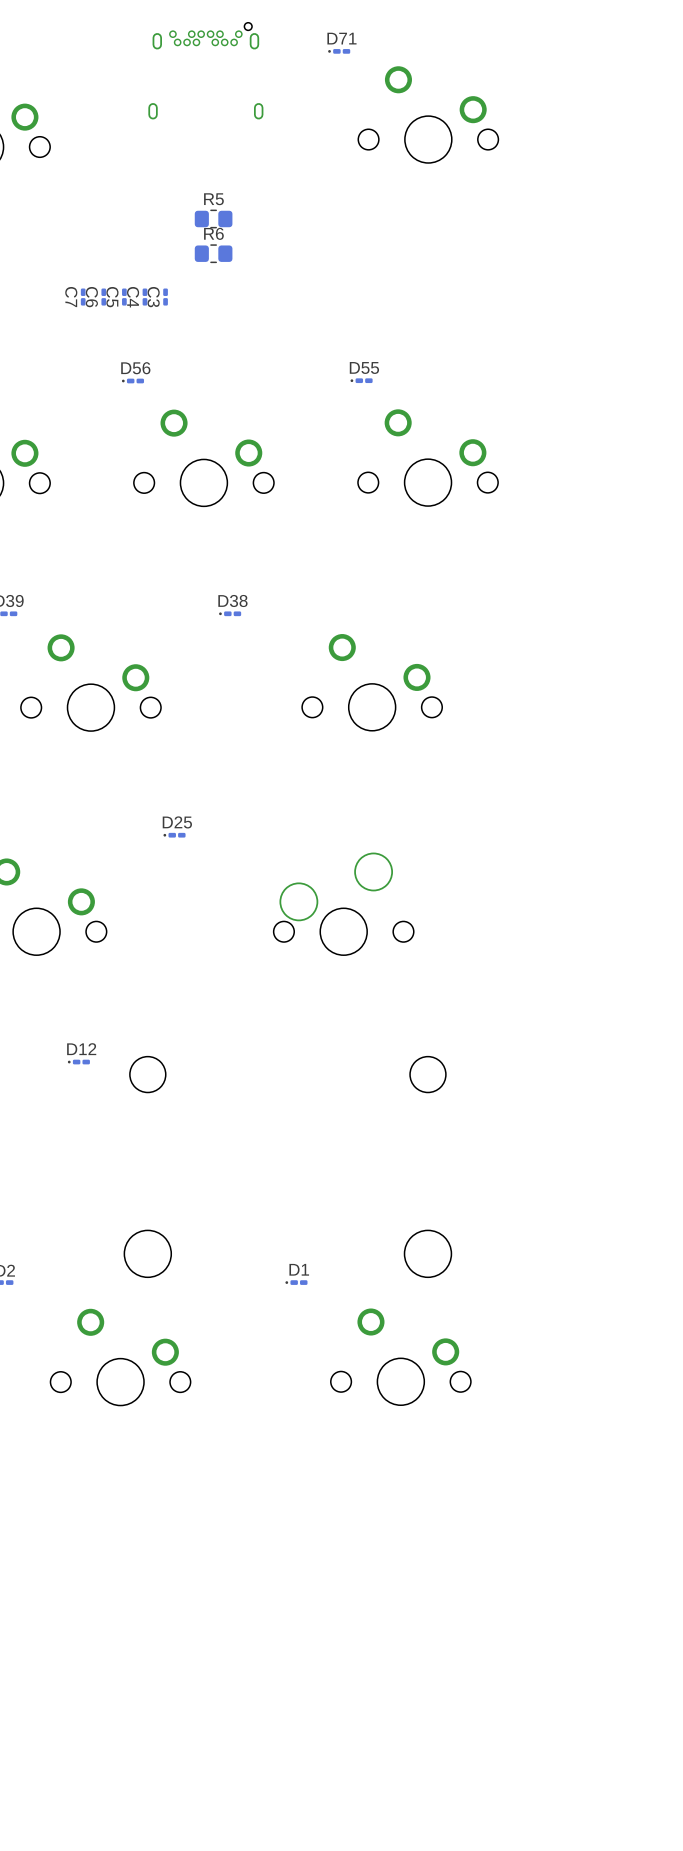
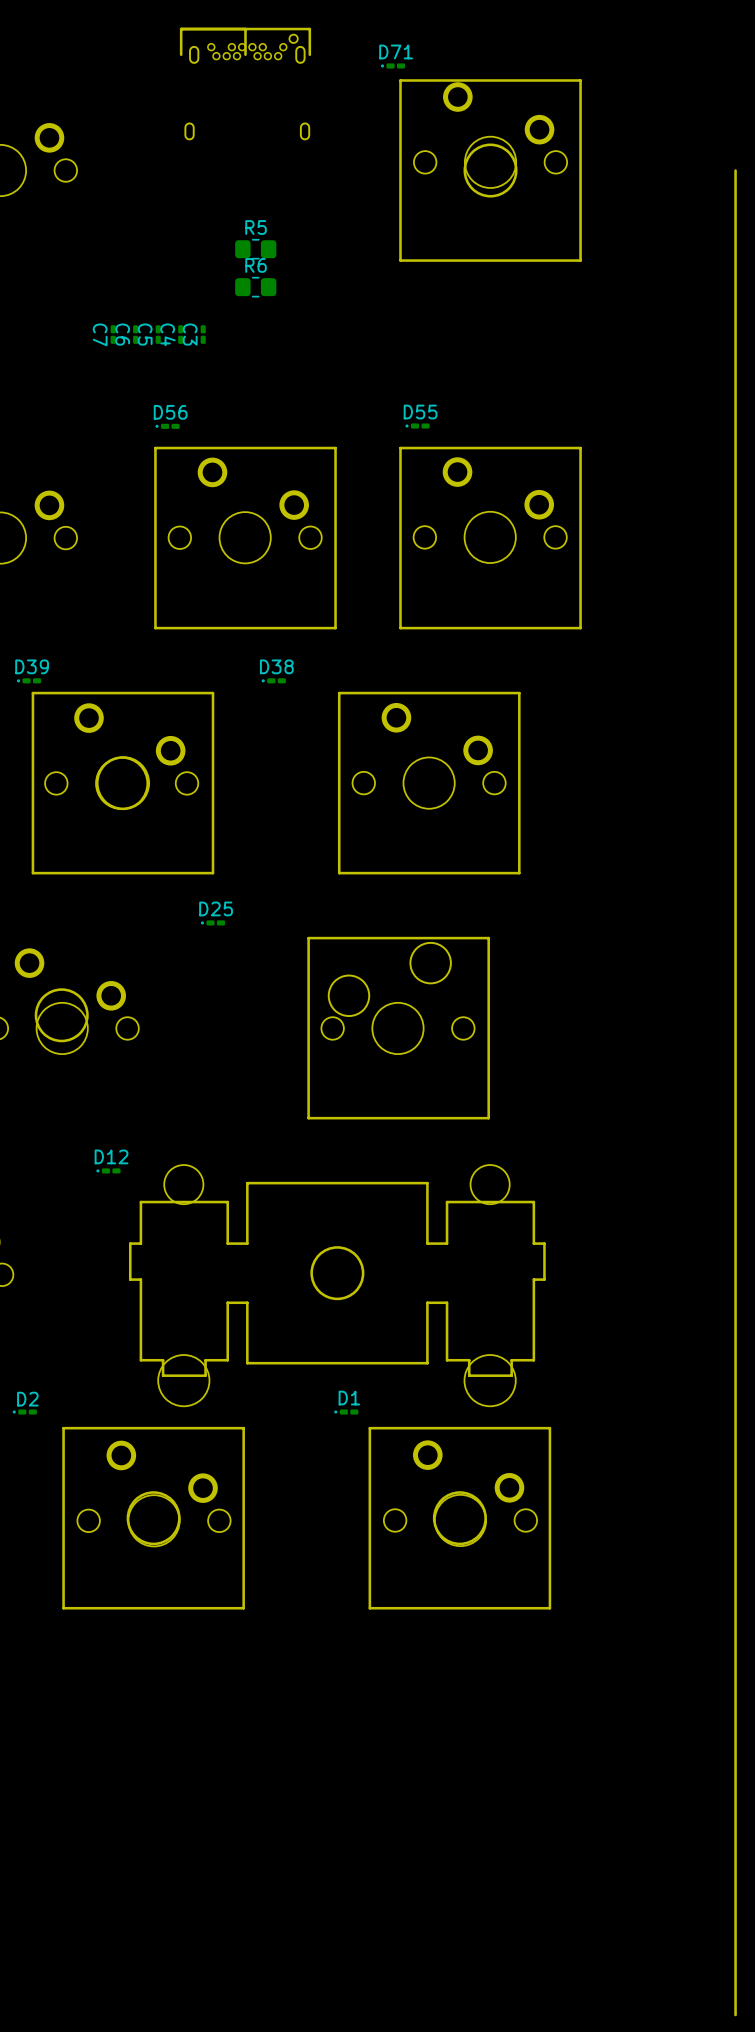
board edge: none -> (245, 29) (245, 54)
board edge: none -> (309, 54) (309, 29) (181, 29) (181, 54)
board edge: none -> (580, 80) (400, 80) (400, 260) (580, 260) (580, 80)
round board edge: none -> [463, 143, 518, 198]
board edge: none -> (735, 170) (735, 2015)
board edge: none -> (335, 448) (335, 628) (155, 628) (155, 448) (335, 448)
board edge: none -> (580, 448) (400, 448) (400, 628) (580, 628) (580, 448)
board edge: none -> (213, 693) (32, 693) (32, 873) (213, 873) (213, 693)
board edge: none -> (519, 693) (519, 873) (339, 873) (339, 693) (519, 693)
round board edge: none -> [95, 756, 150, 811]
board edge: none -> (488, 938) (308, 938) (308, 1118) (488, 1118) (488, 938)
round board edge: none -> [34, 988, 89, 1043]
board edge: none -> (427, 1183) (247, 1183) (247, 1243) (227, 1243) (227, 1202) (140, 1202) (140, 1243) (130, 1243) (130, 1279) (140, 1279) (140, 1360) (163, 1360) (163, 1375) (205, 1375) (205, 1360) (227, 1360) (227, 1302) (247, 1302) (247, 1363) (427, 1363) (427, 1302) (447, 1302) (447, 1360) (469, 1360) (469, 1375) (511, 1375) (511, 1360) (533, 1360) (533, 1279) (544, 1279) (544, 1243) (533, 1243) (533, 1202) (447, 1202) (447, 1243) (427, 1243) (427, 1183)
round board edge: none -> [310, 1246, 365, 1301]
board edge: none -> (243, 1428) (63, 1428) (63, 1608) (243, 1608) (243, 1428)
board edge: none -> (549, 1428) (369, 1428) (369, 1608) (549, 1608) (549, 1428)
round board edge: none -> [126, 1491, 181, 1546]
round board edge: none -> [432, 1491, 487, 1546]

